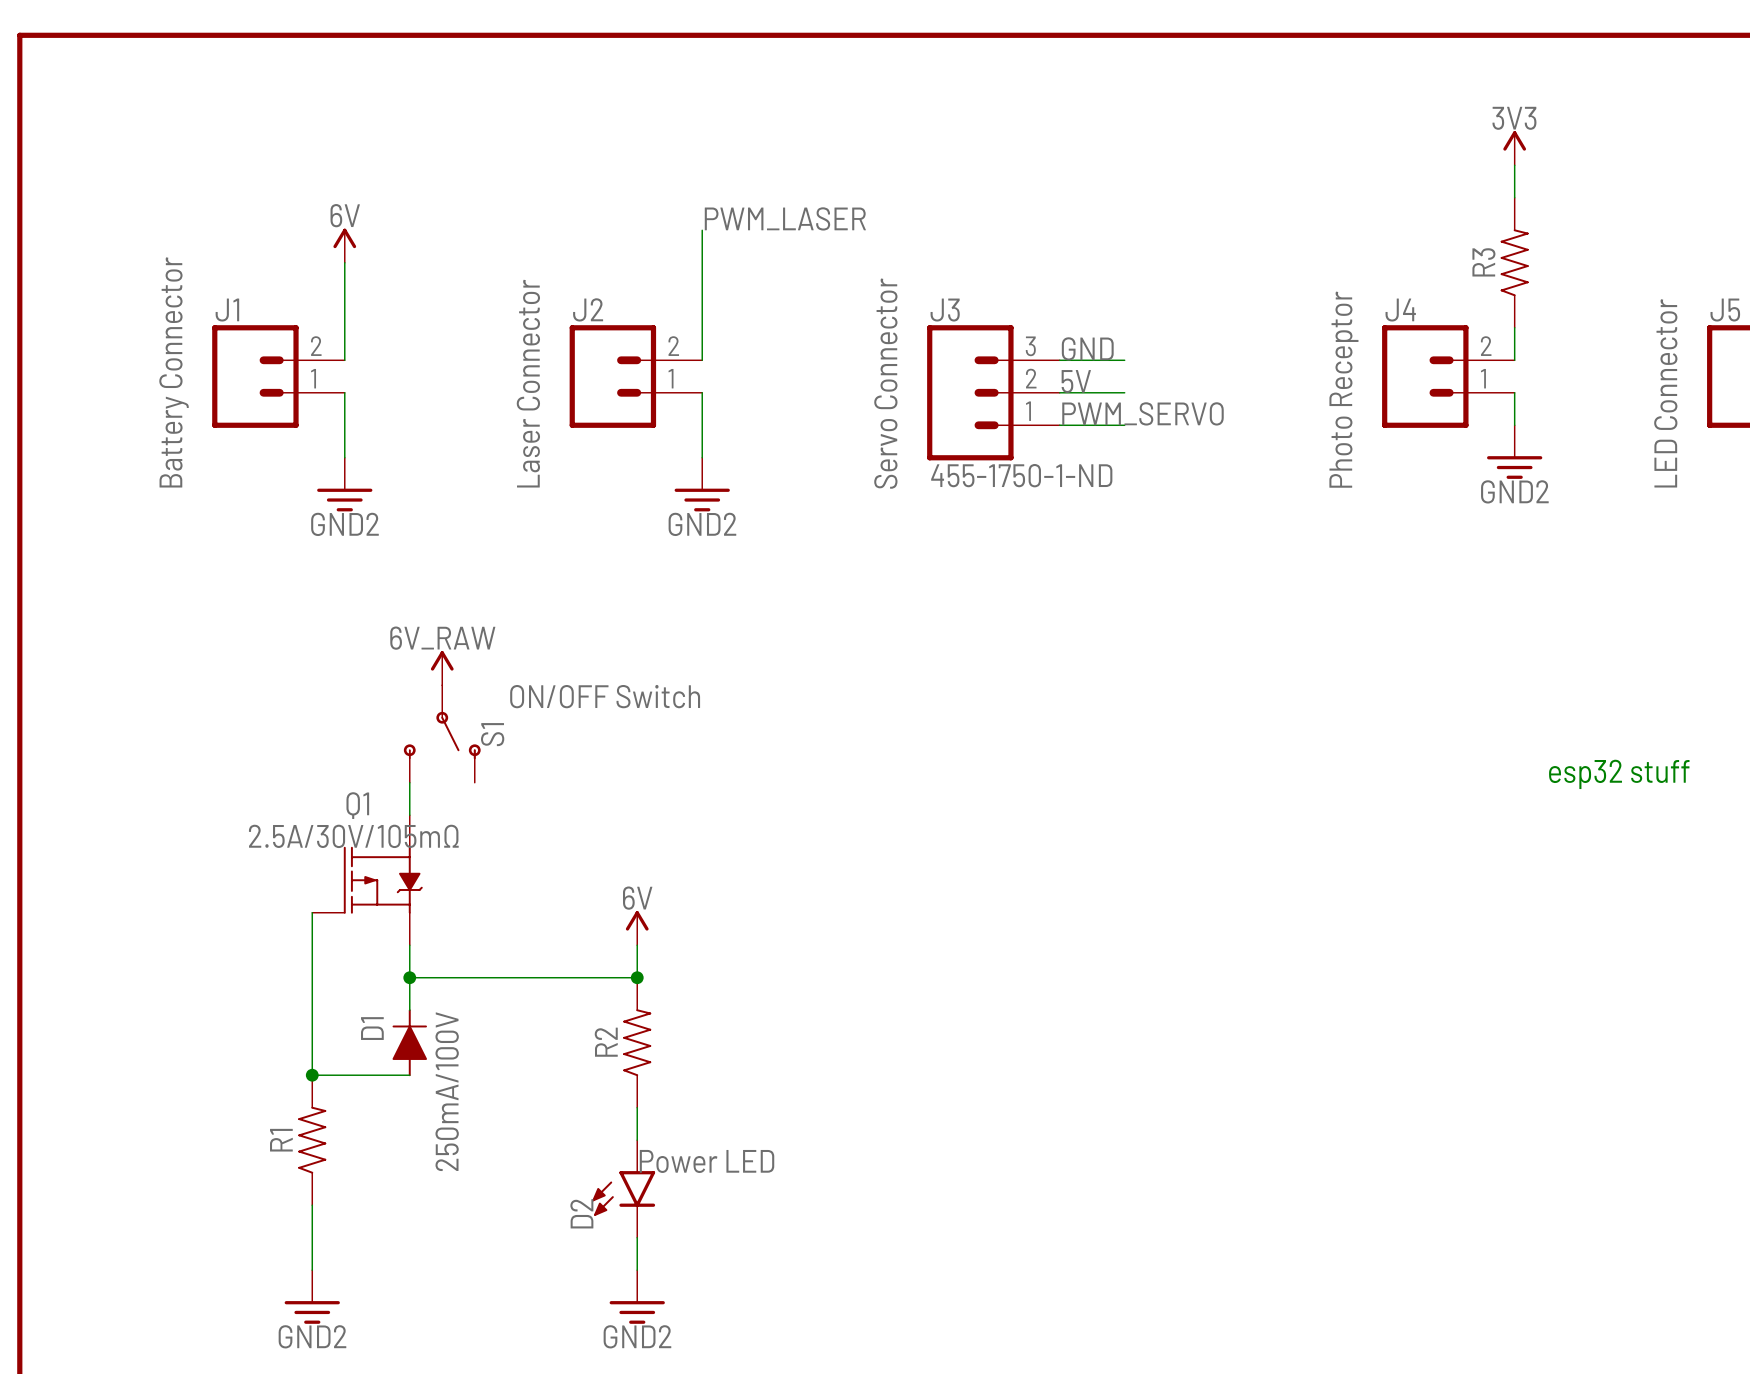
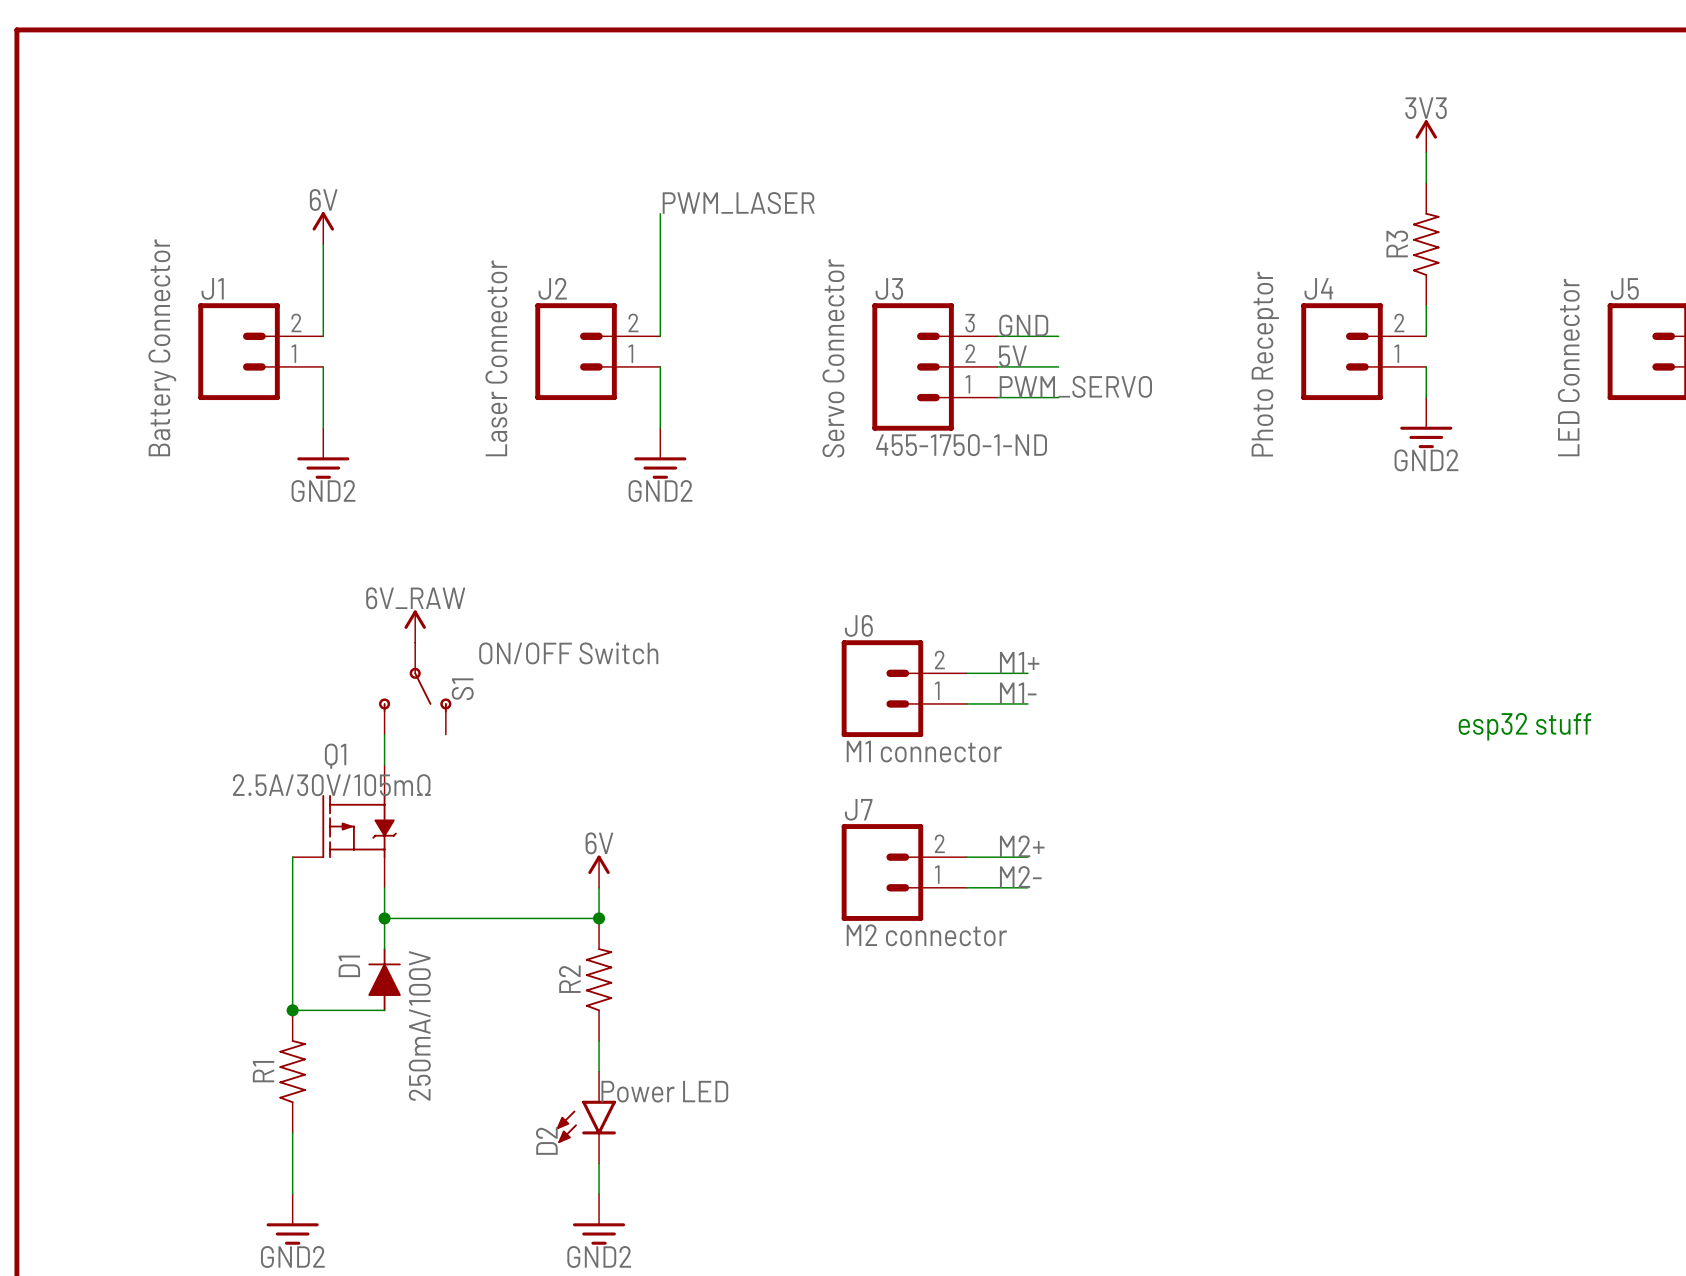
label: none -> M1+ (1019, 662)
wire: none -> (966, 673) (1027, 673)
J6: none -> M1 connector (904, 688)
label: none -> M1- (1018, 693)
wire: none -> (966, 703) (1027, 703)
label: none -> M2+ (1022, 846)
wire: none -> (966, 857) (1027, 857)
J7: none -> M2 connector (904, 872)
label: none -> M2- (1020, 876)
wire: none -> (966, 887) (1027, 887)

